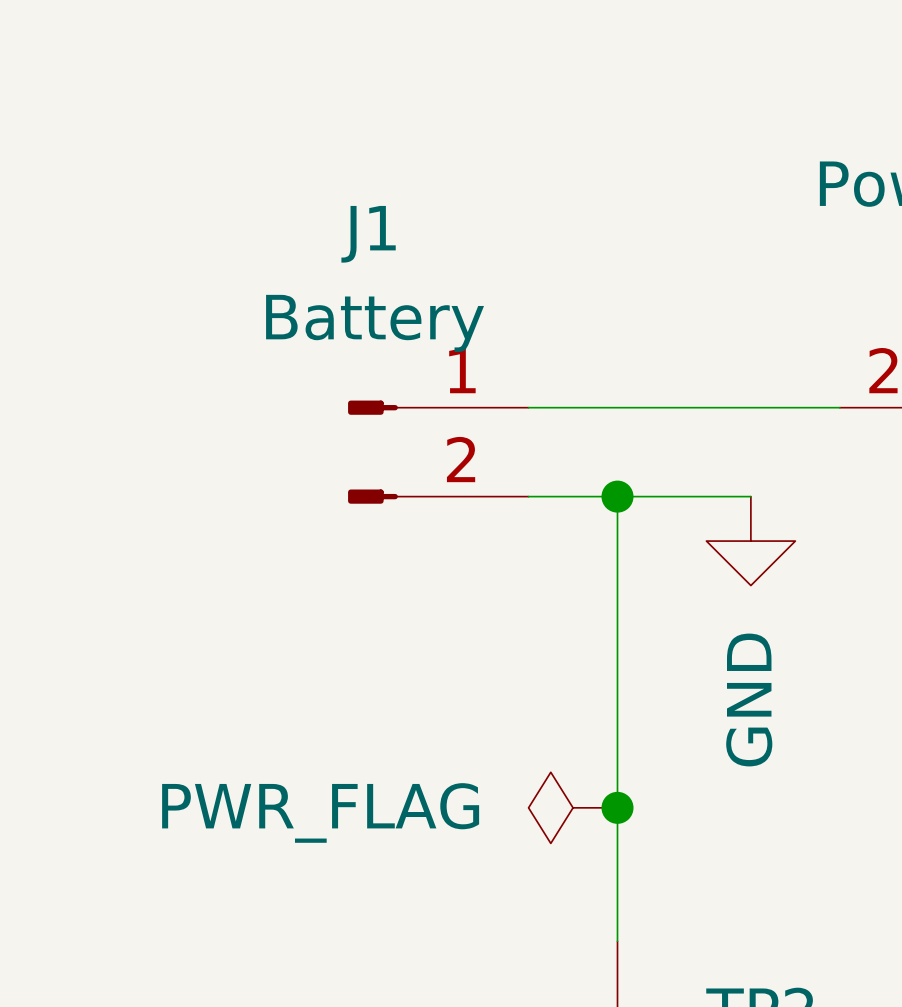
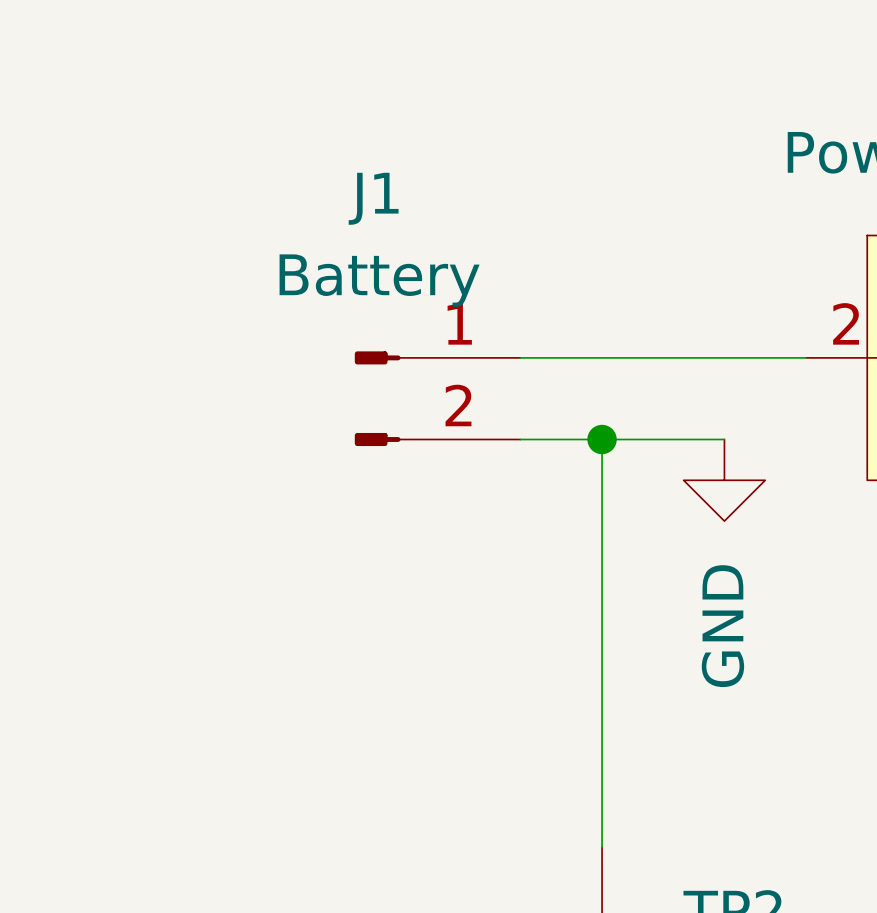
power symbol: PWR_FLAG (573, 807) -> none
junction: (617, 807) -> none

